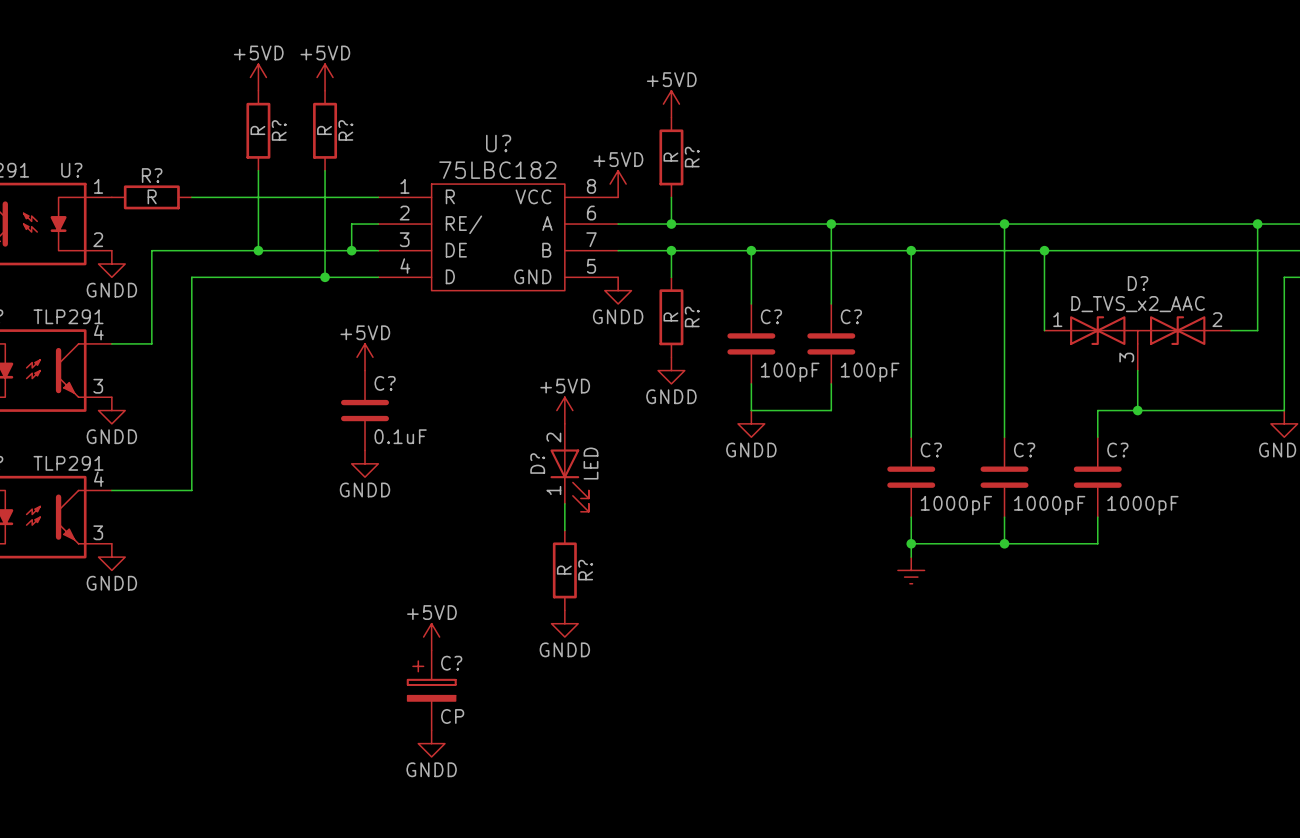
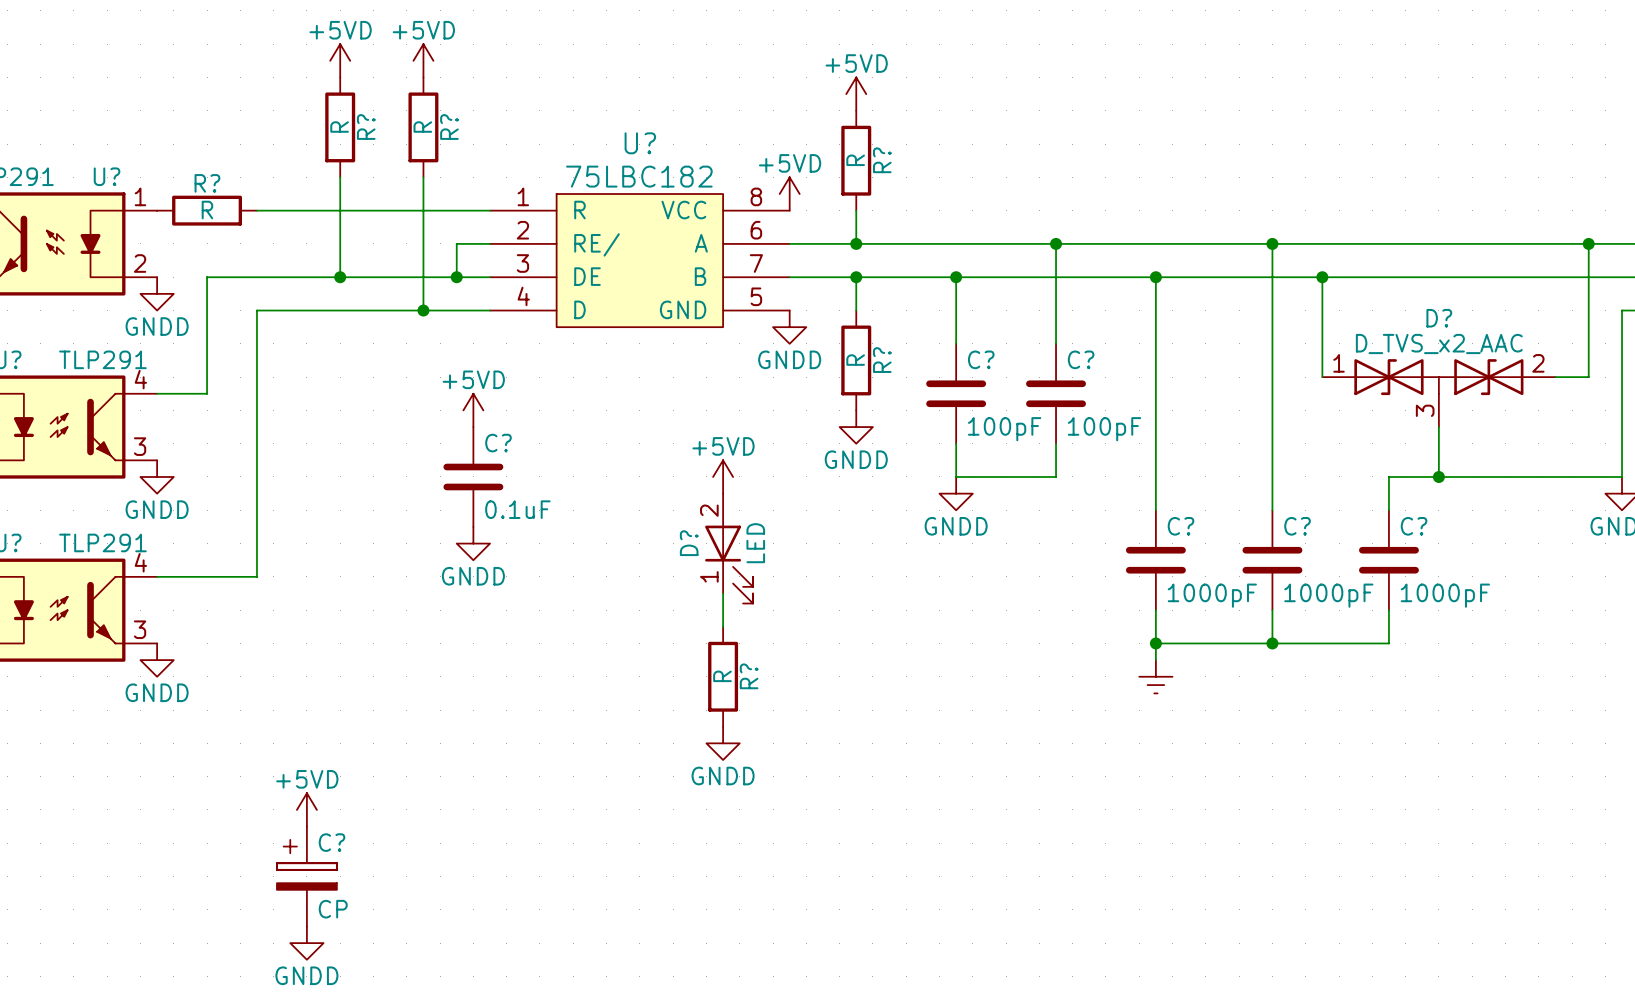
power symbol position: +5VD (431, 637) -> +5VD (306, 809)
C? position: (431, 690) -> (306, 876)
power symbol position: GNDD (431, 743) -> GNDD (306, 943)

